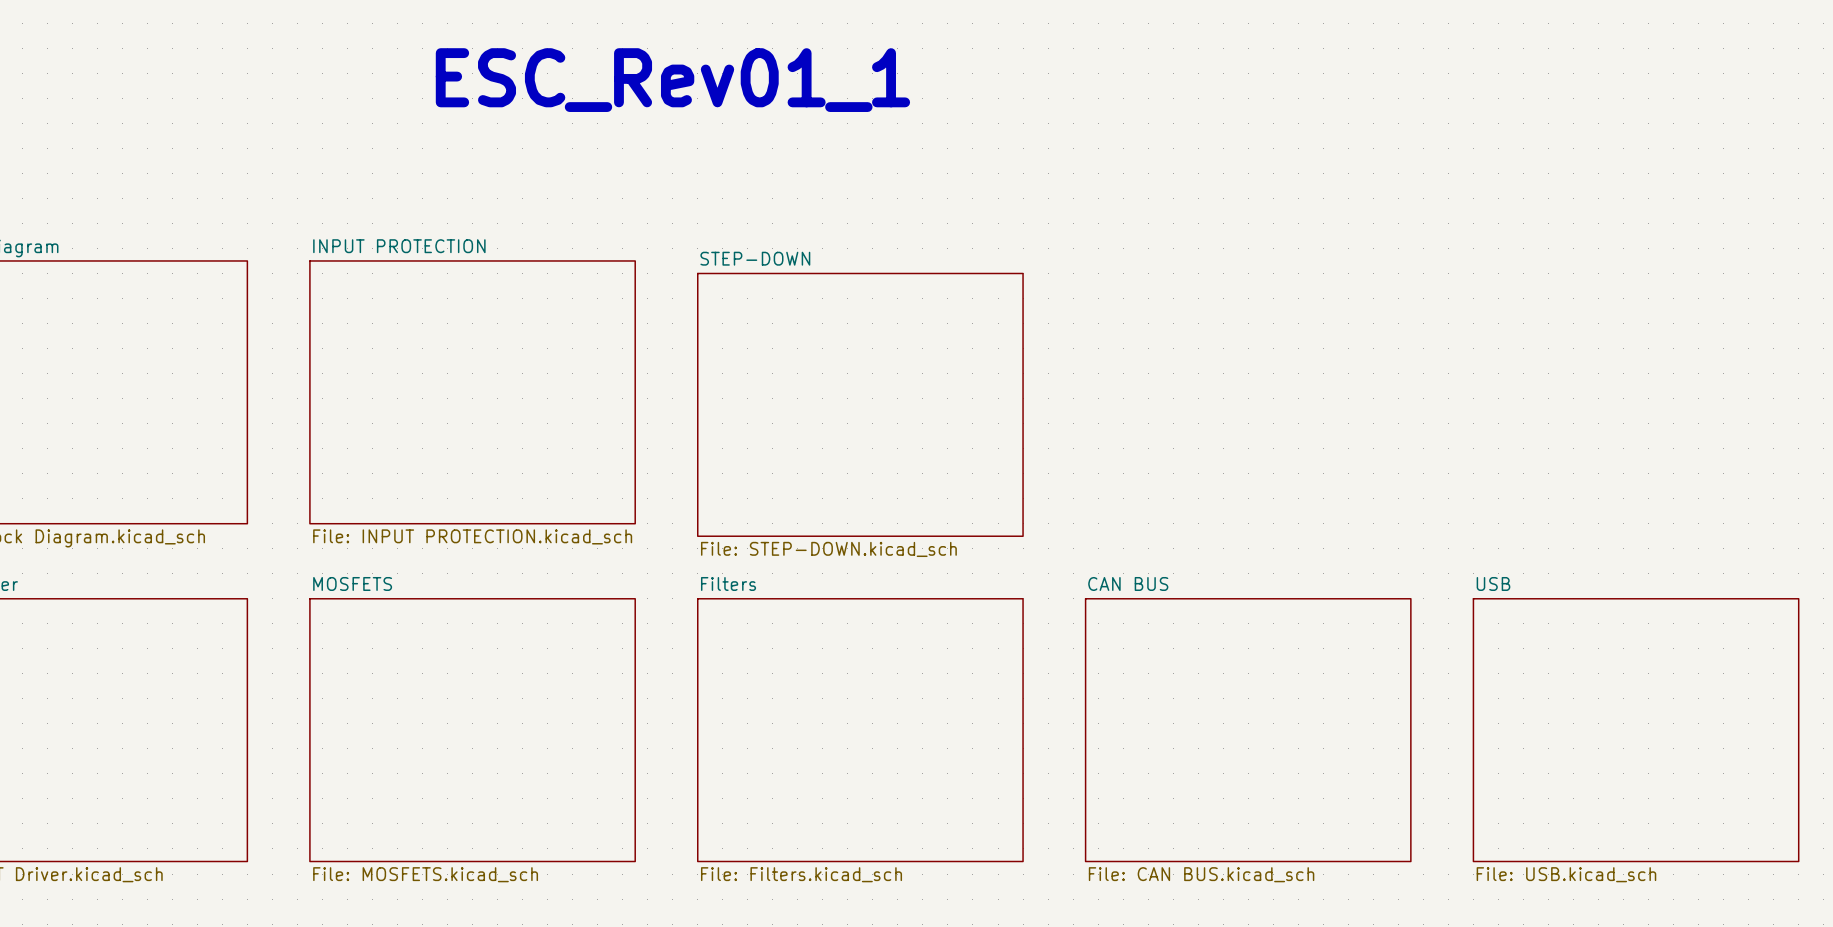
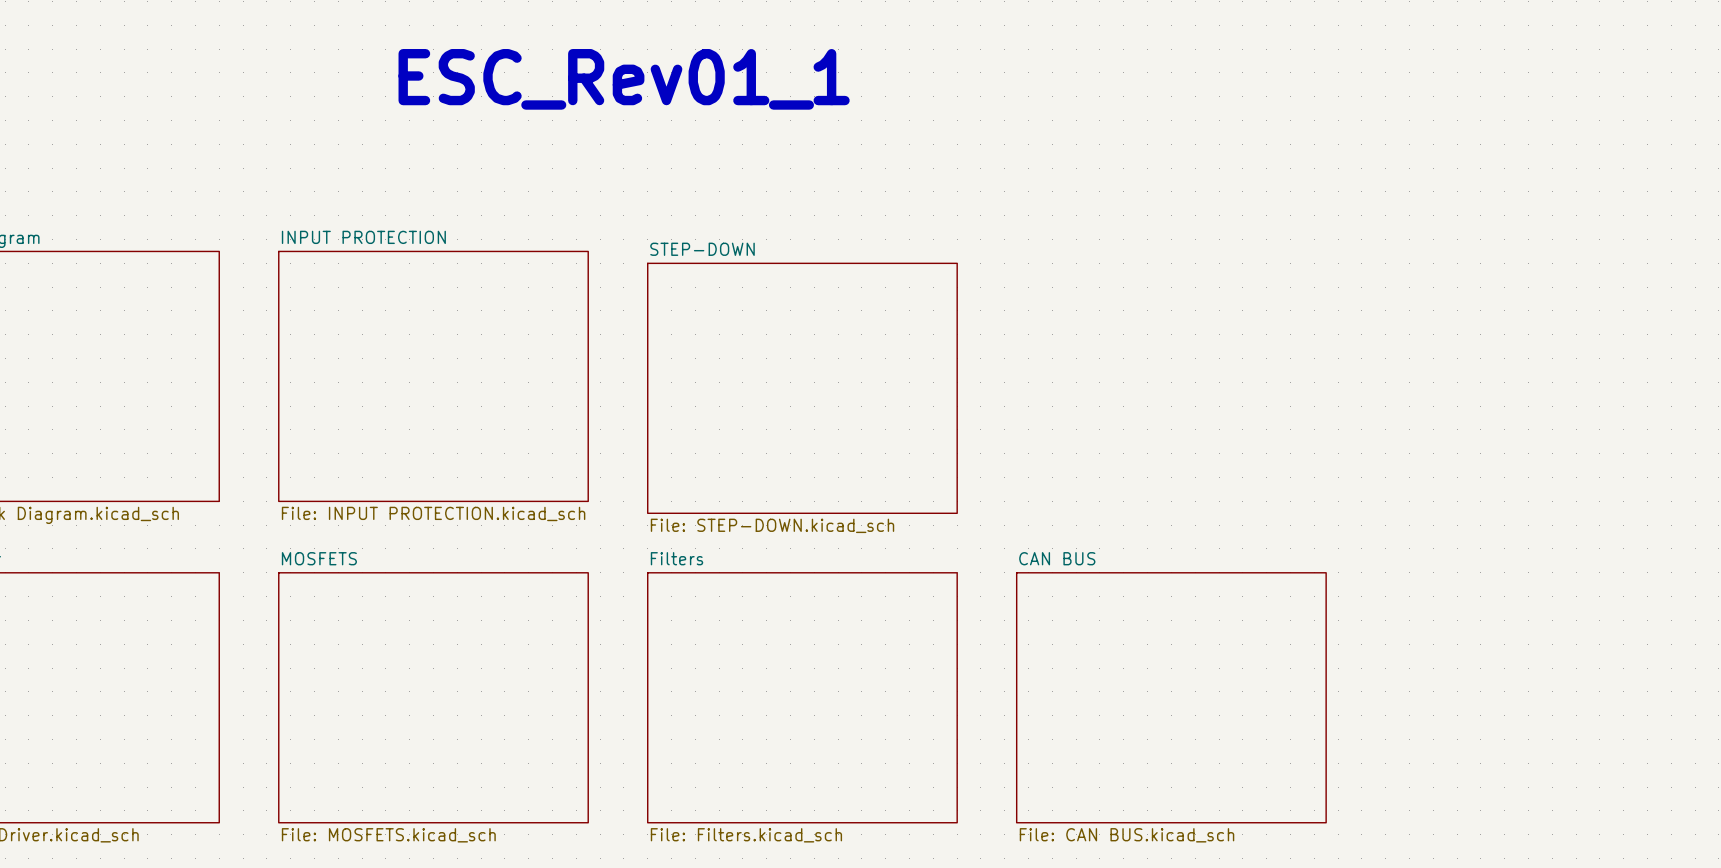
sheet USB: File: USB.kicad_sch (1636, 730) -> none

